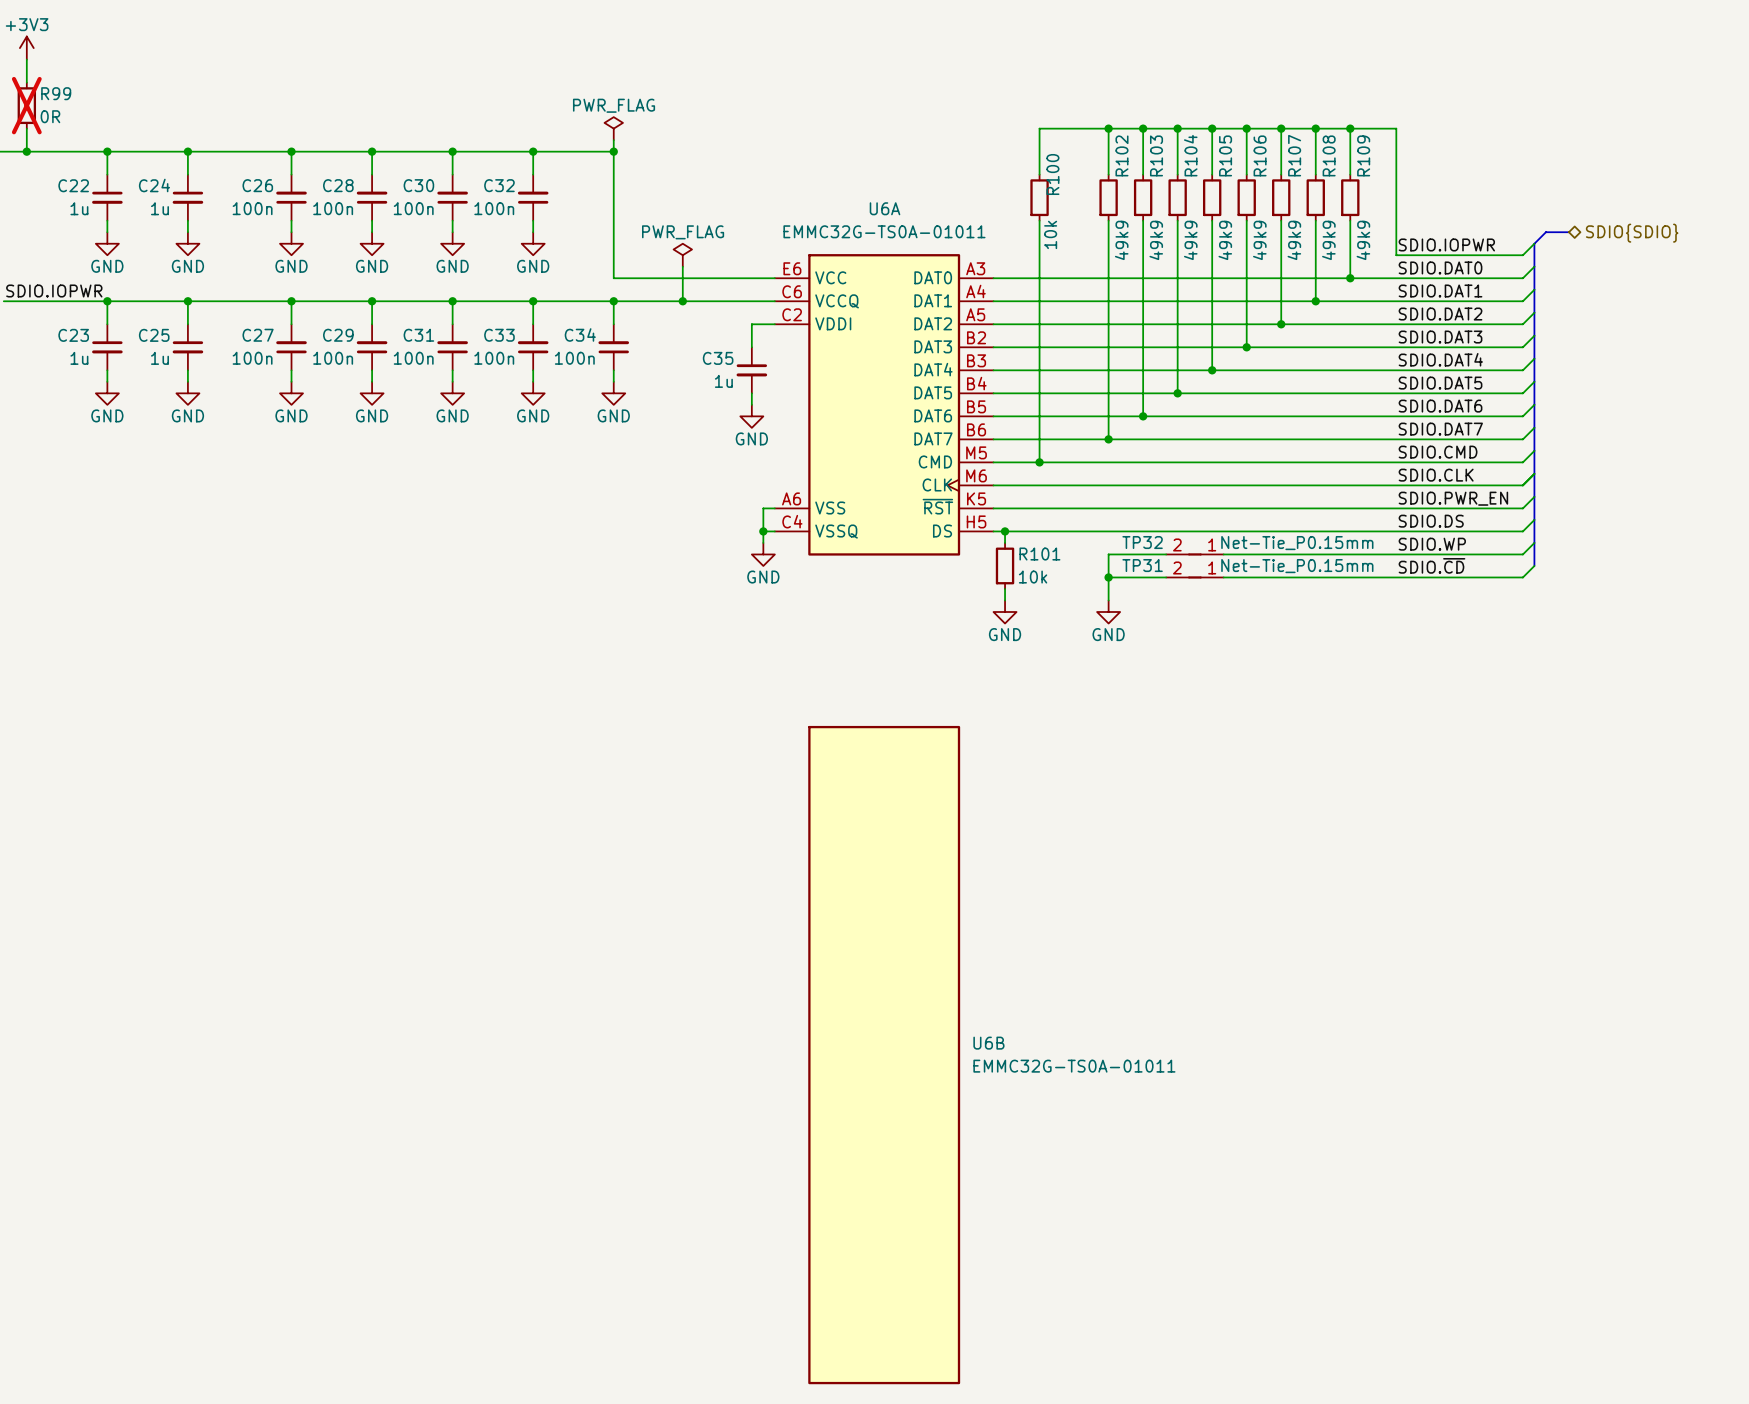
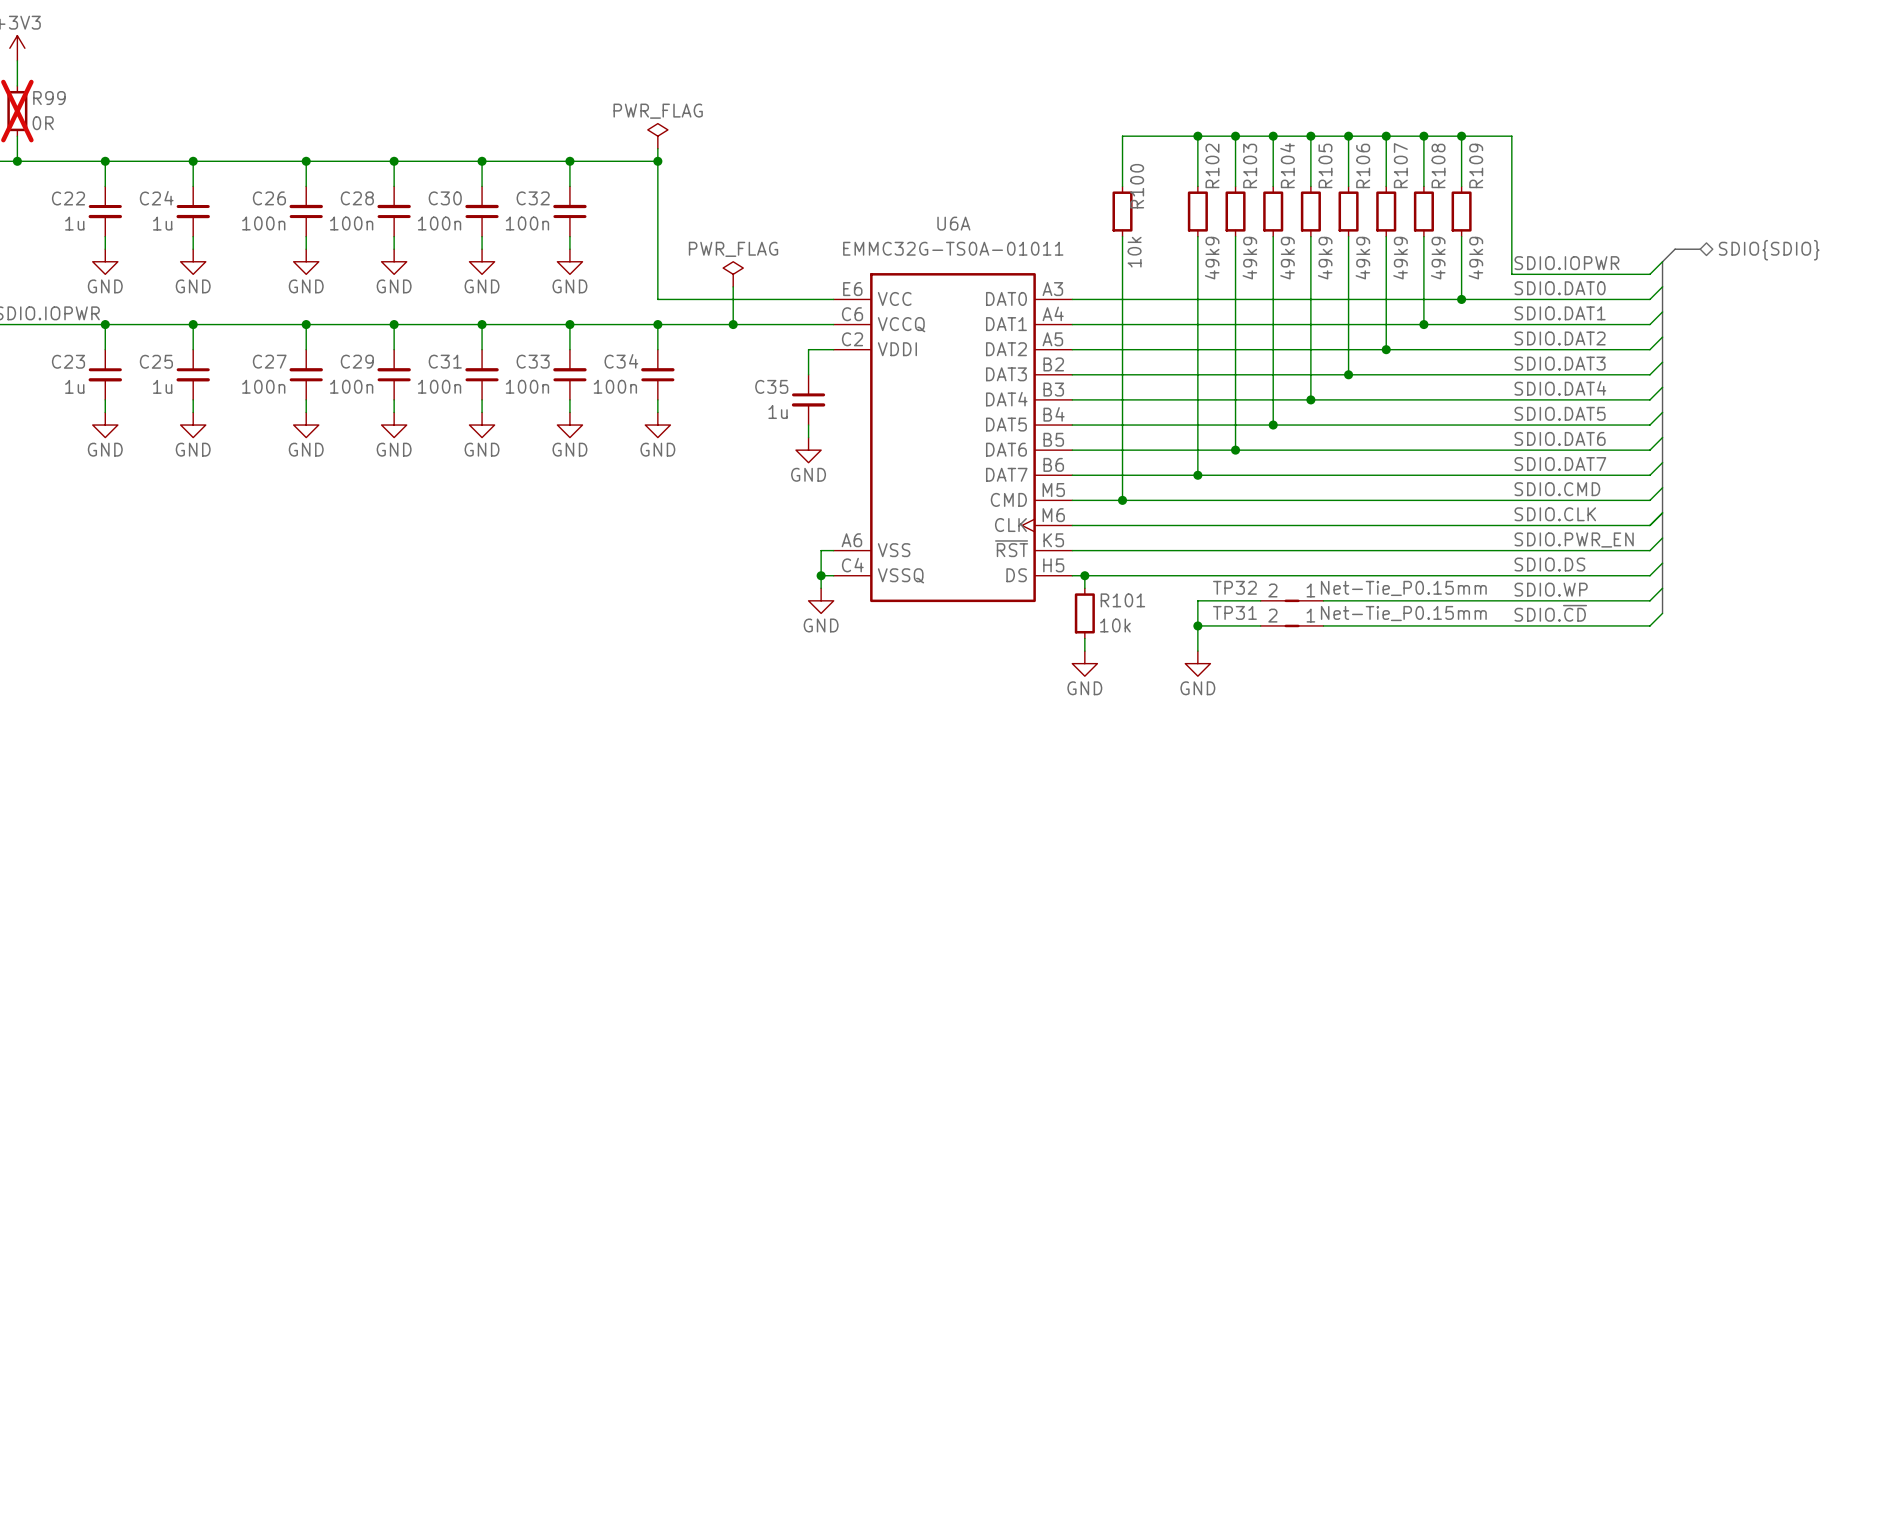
U6B: (884, 1055) -> none

